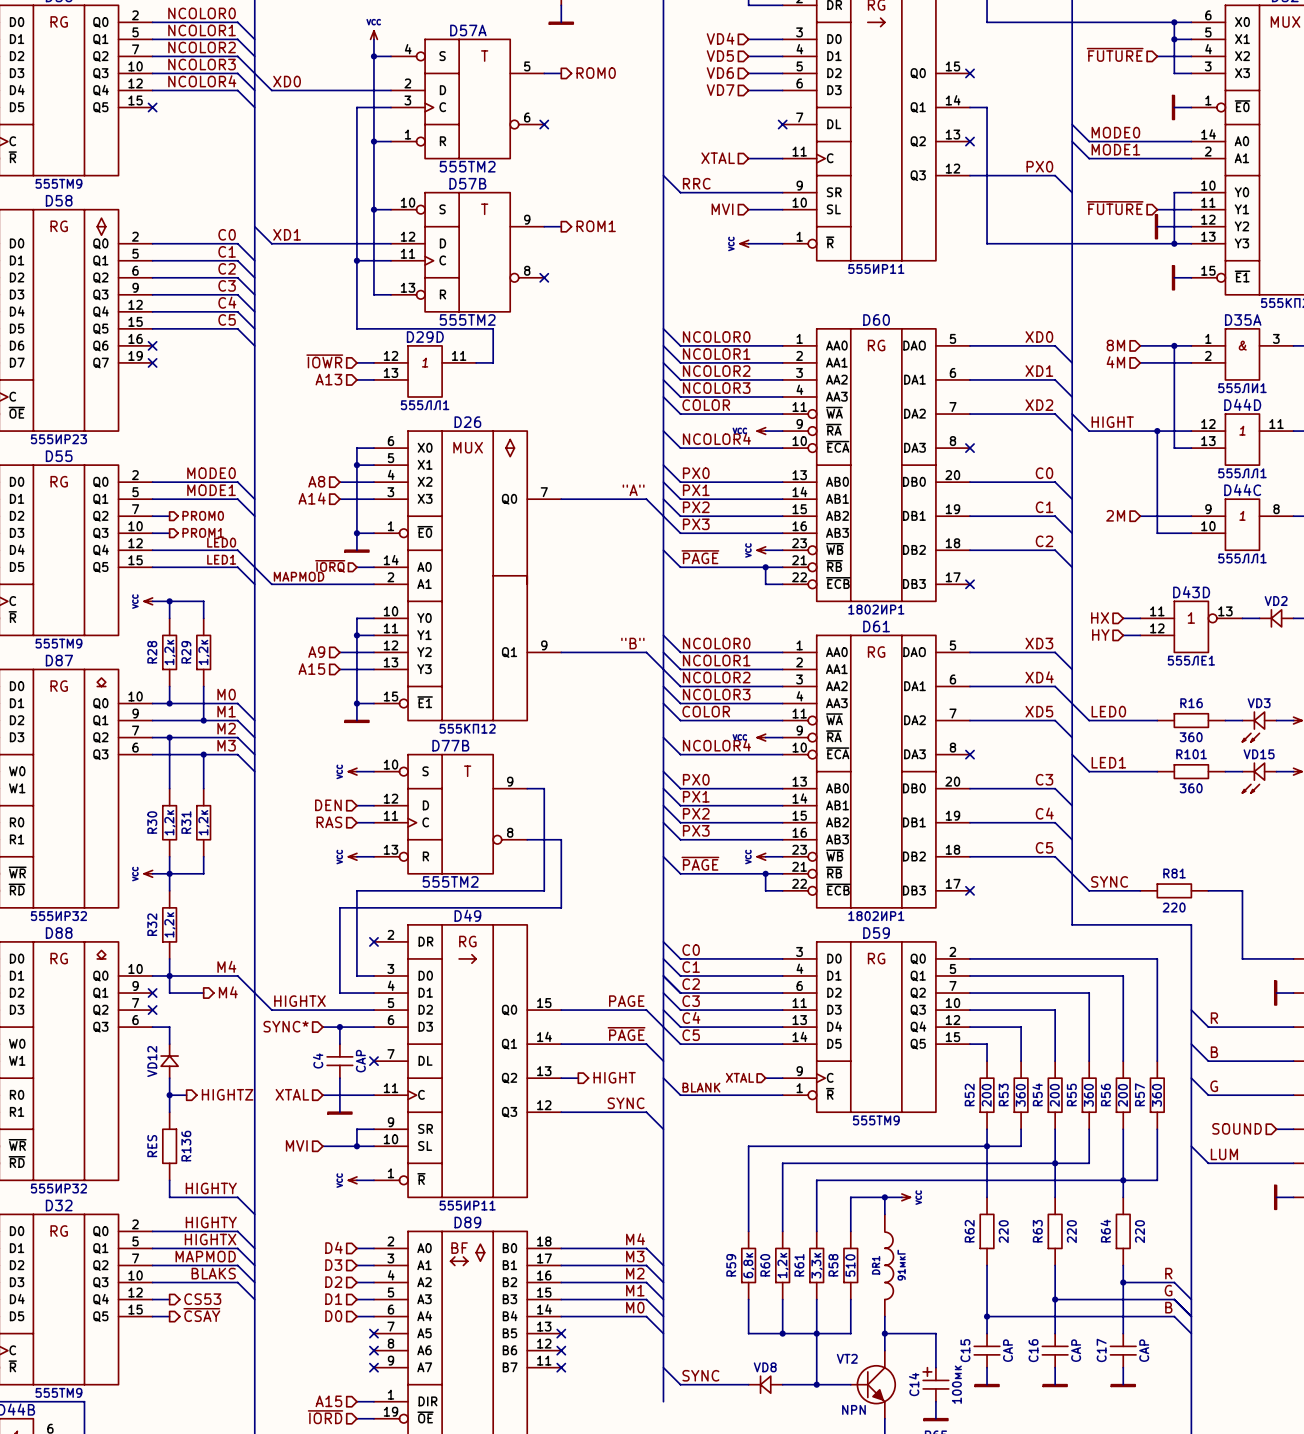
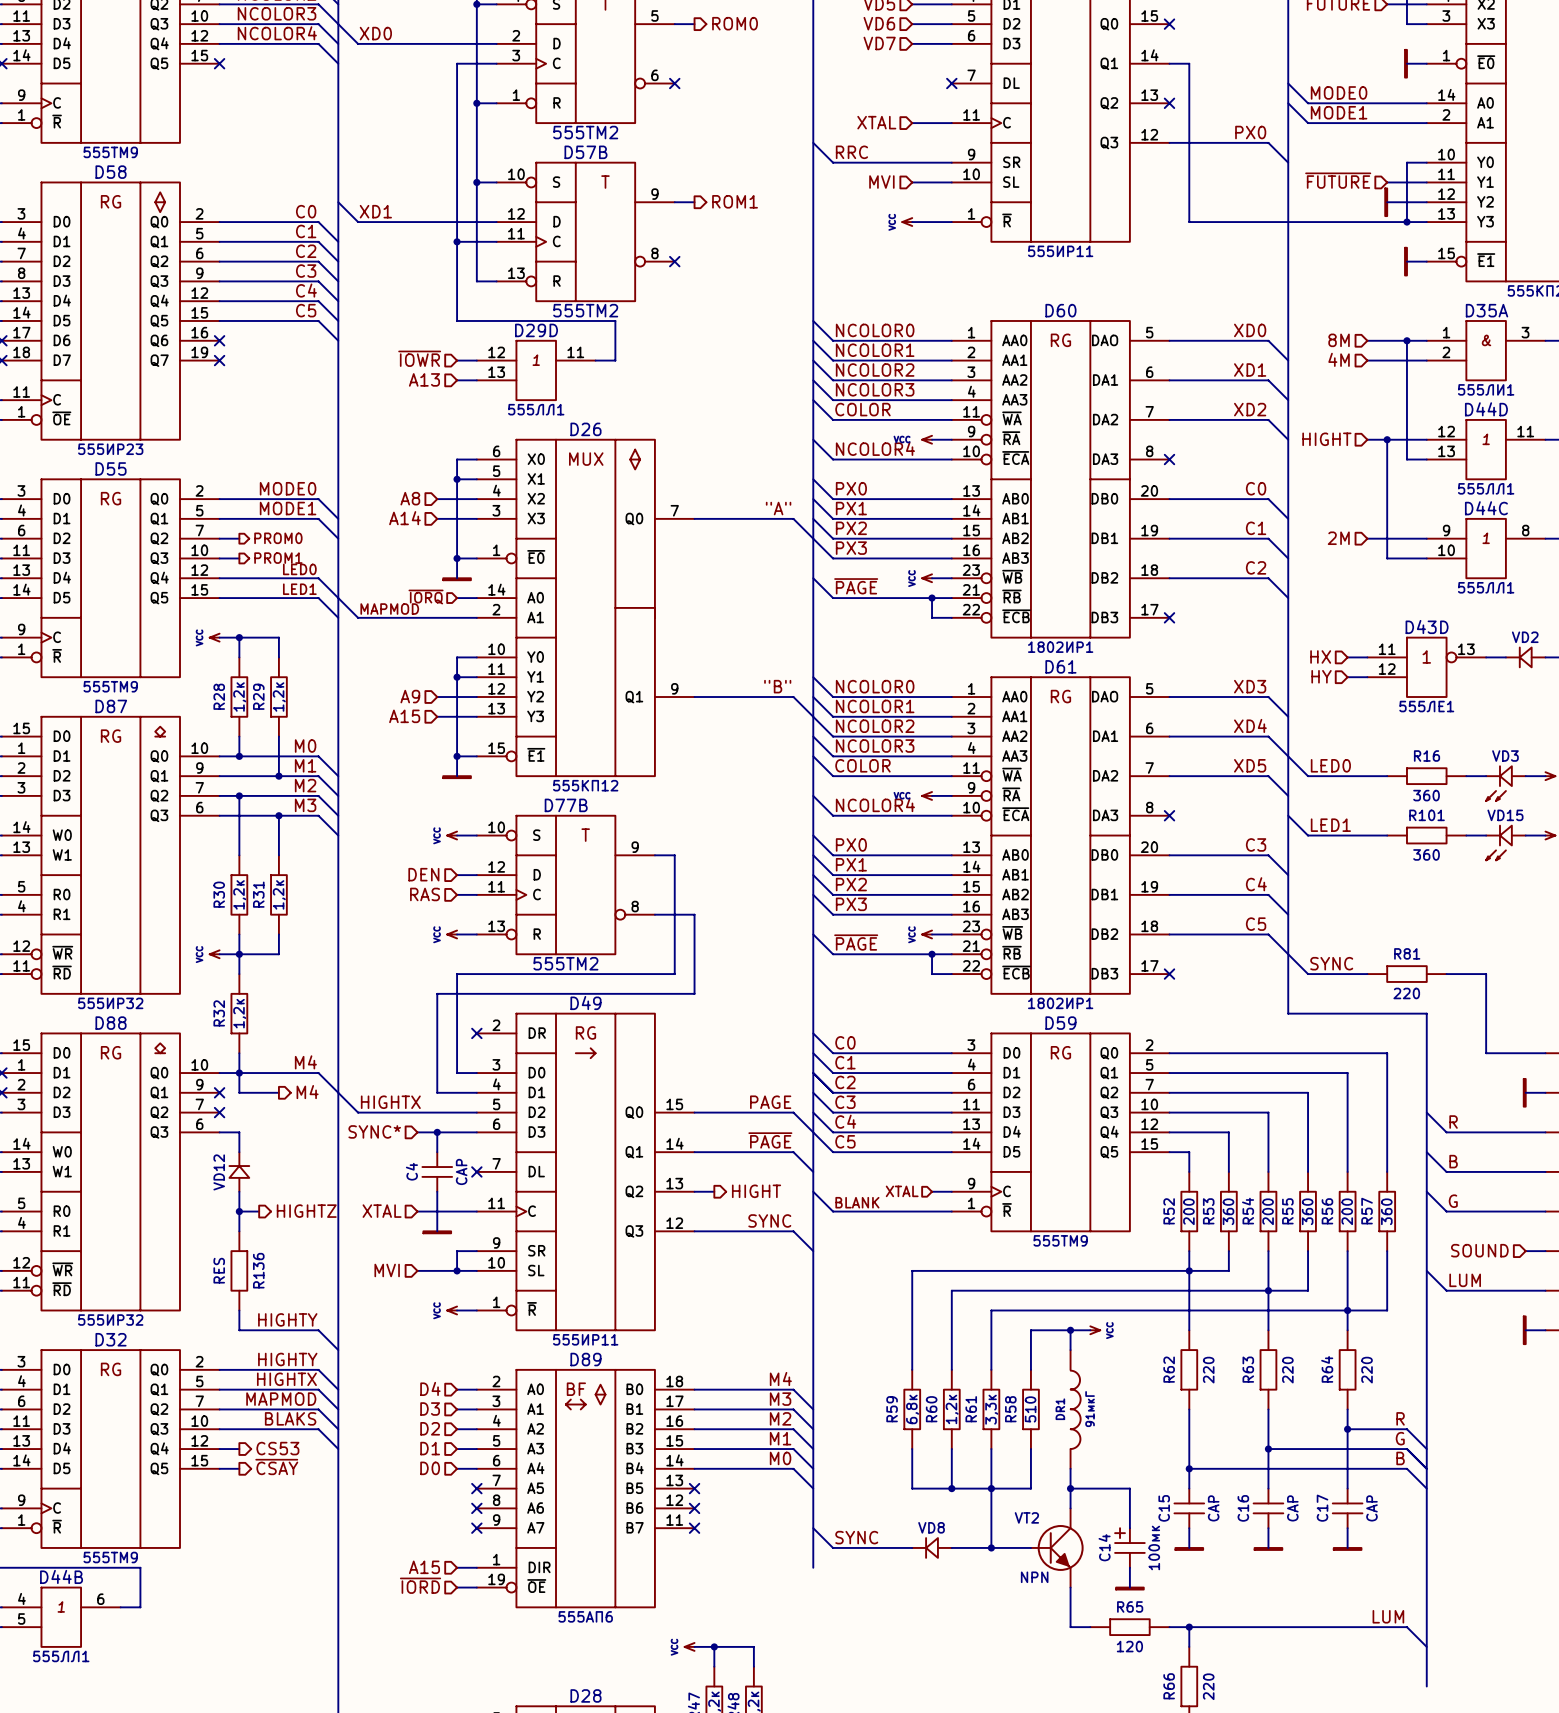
wire: (1072, 414) (1089, 431) (1140, 431) -> none
label: HIGHT (1112, 422) -> none
hierarchical label: none -> HIGHT (1326, 439)

